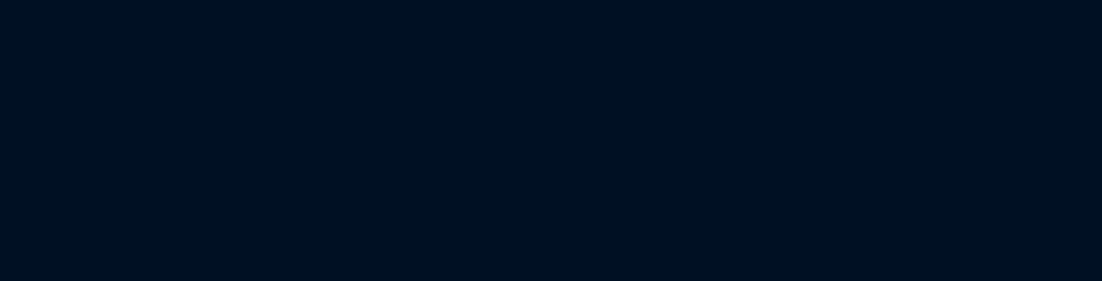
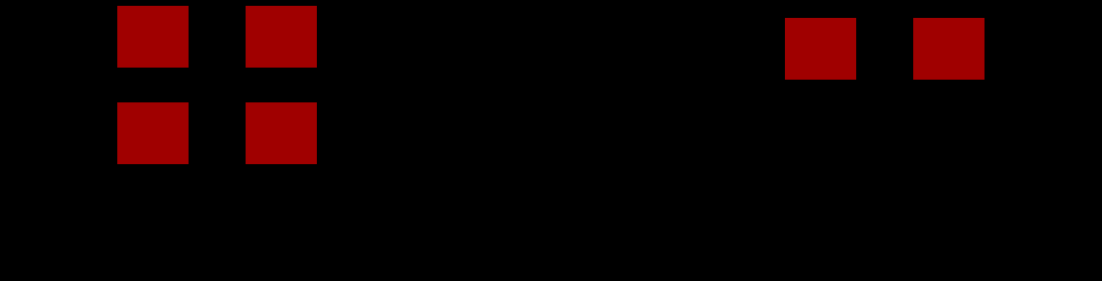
part: none -> (217, 36)
part: none -> (884, 48)
part: none -> (217, 133)

